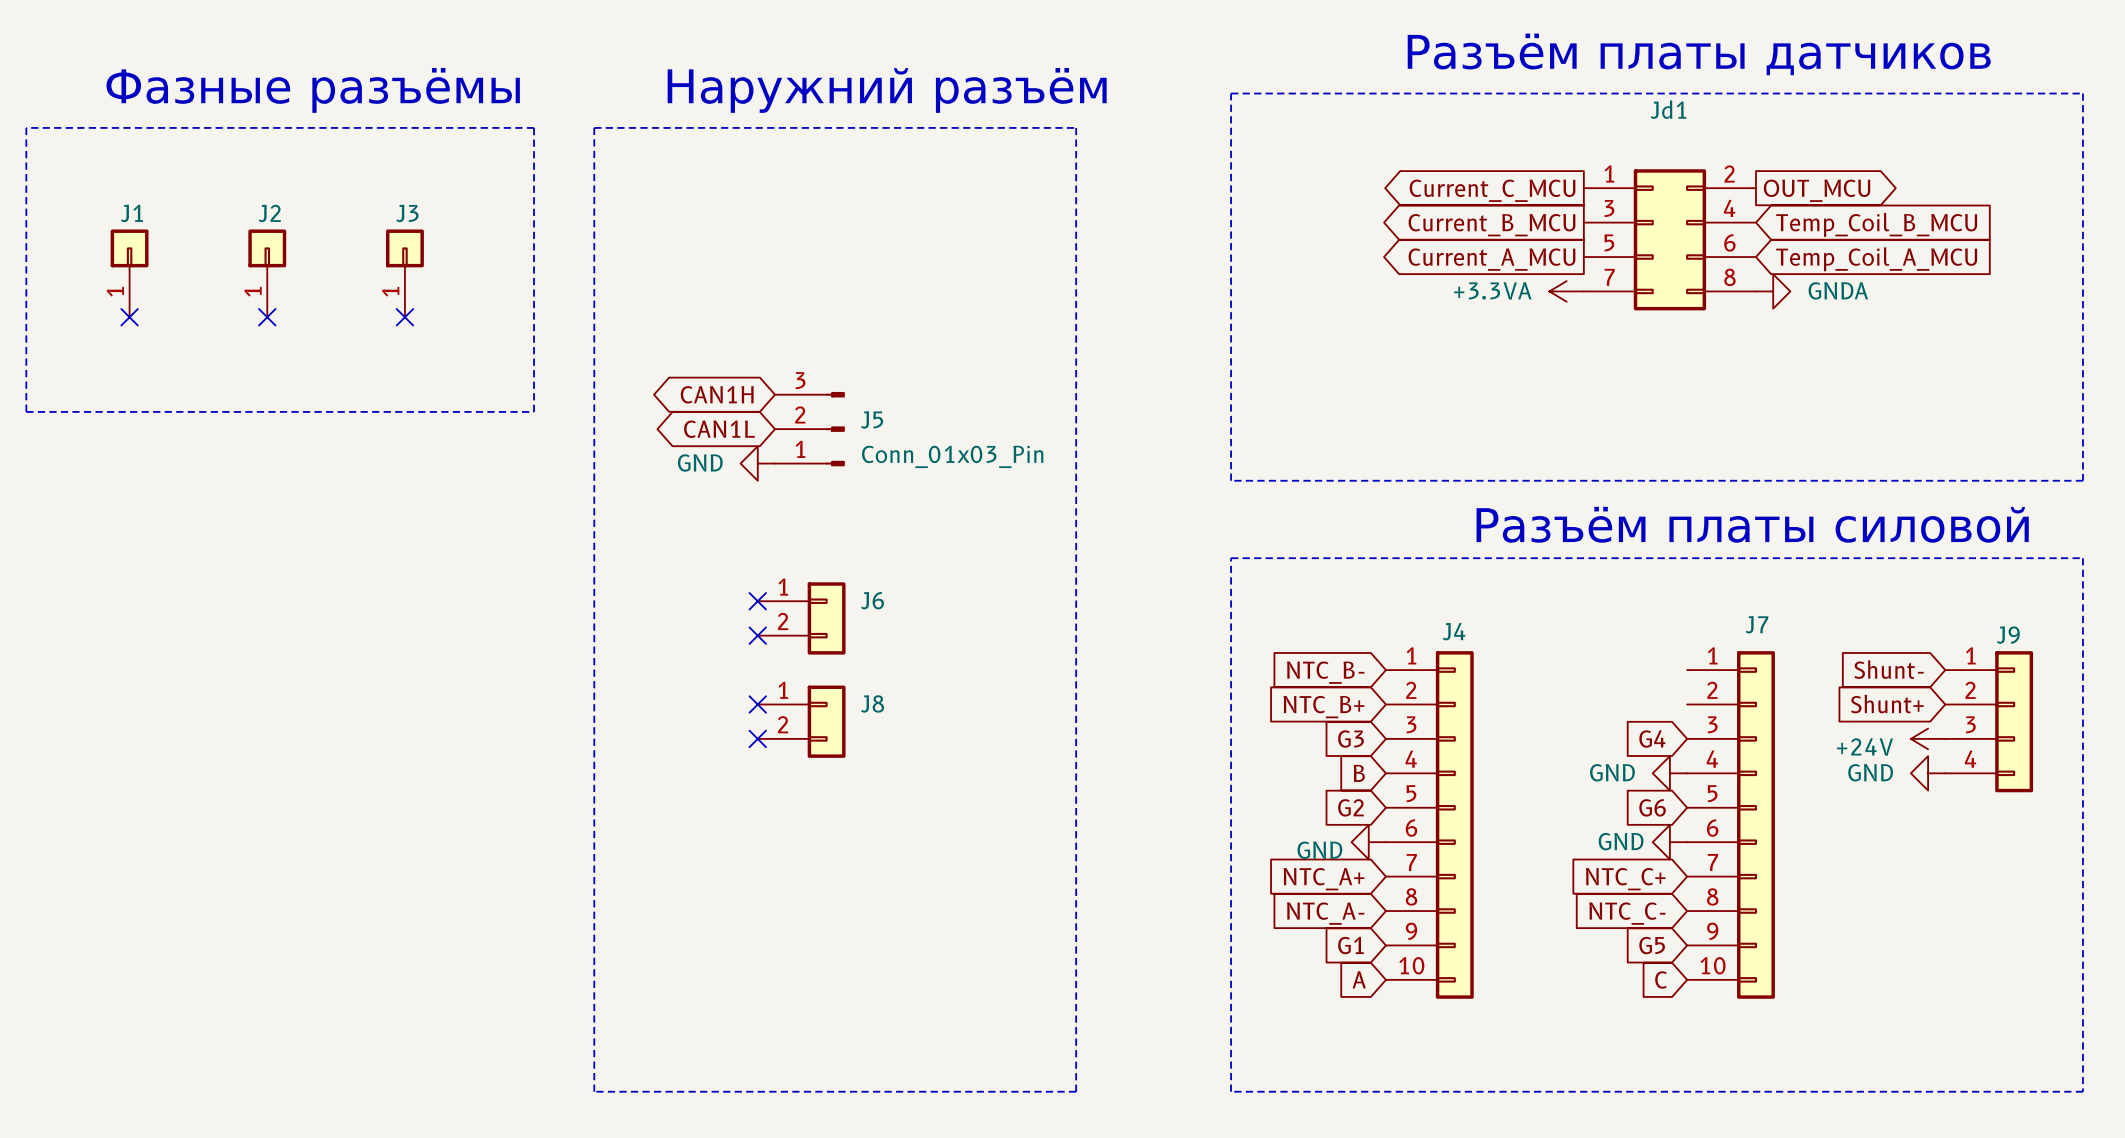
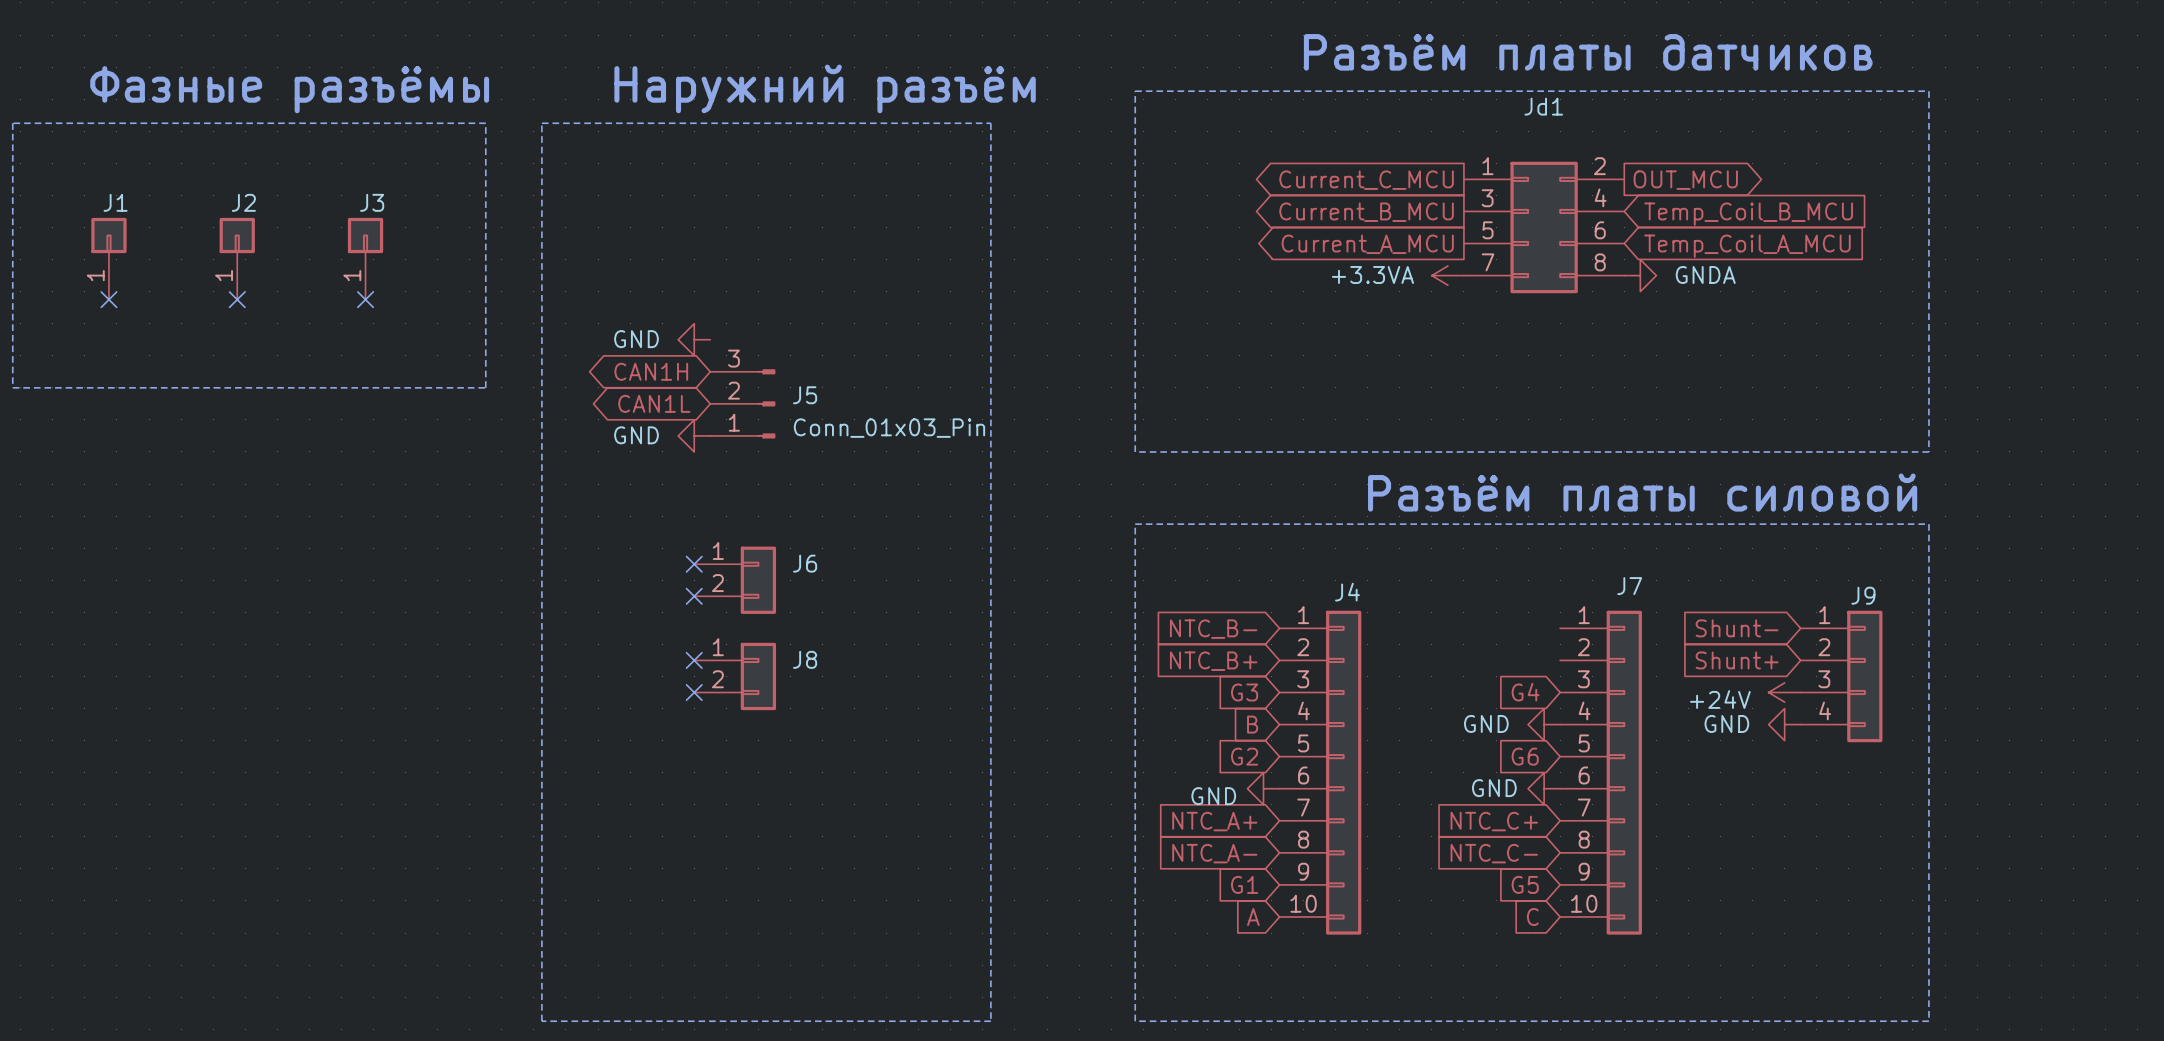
power symbol: none -> GND (694, 339)

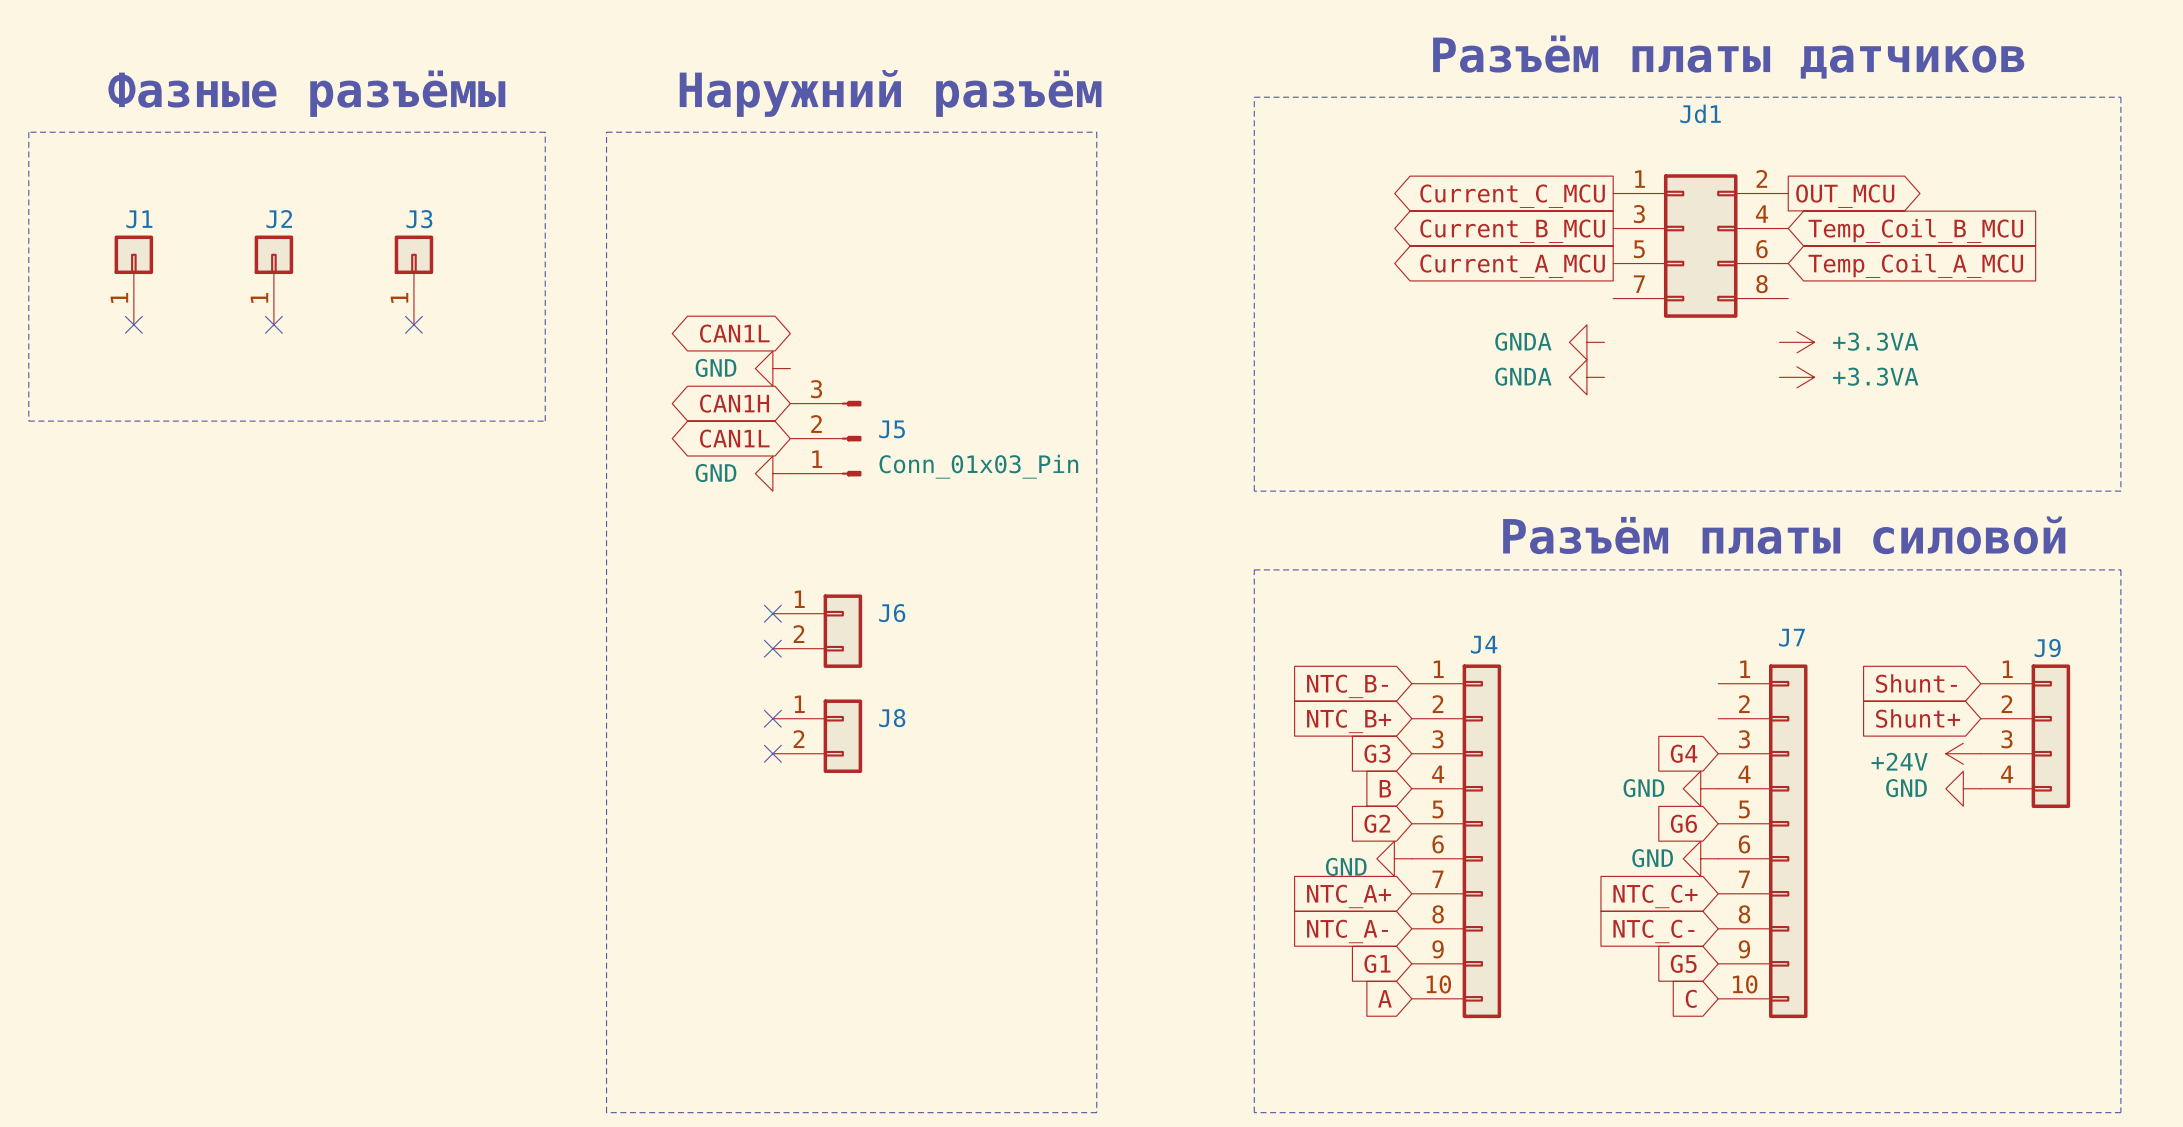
power symbol: +3.3VA (1447, 275) -> none
power symbol: GNDA (1640, 275) -> none
global label: none -> CAN1L (734, 333)
power symbol: none -> GNDA (1586, 342)
power symbol: none -> +3.3VA (1797, 342)
power symbol: none -> GNDA (1586, 377)
power symbol: none -> +3.3VA (1797, 377)

